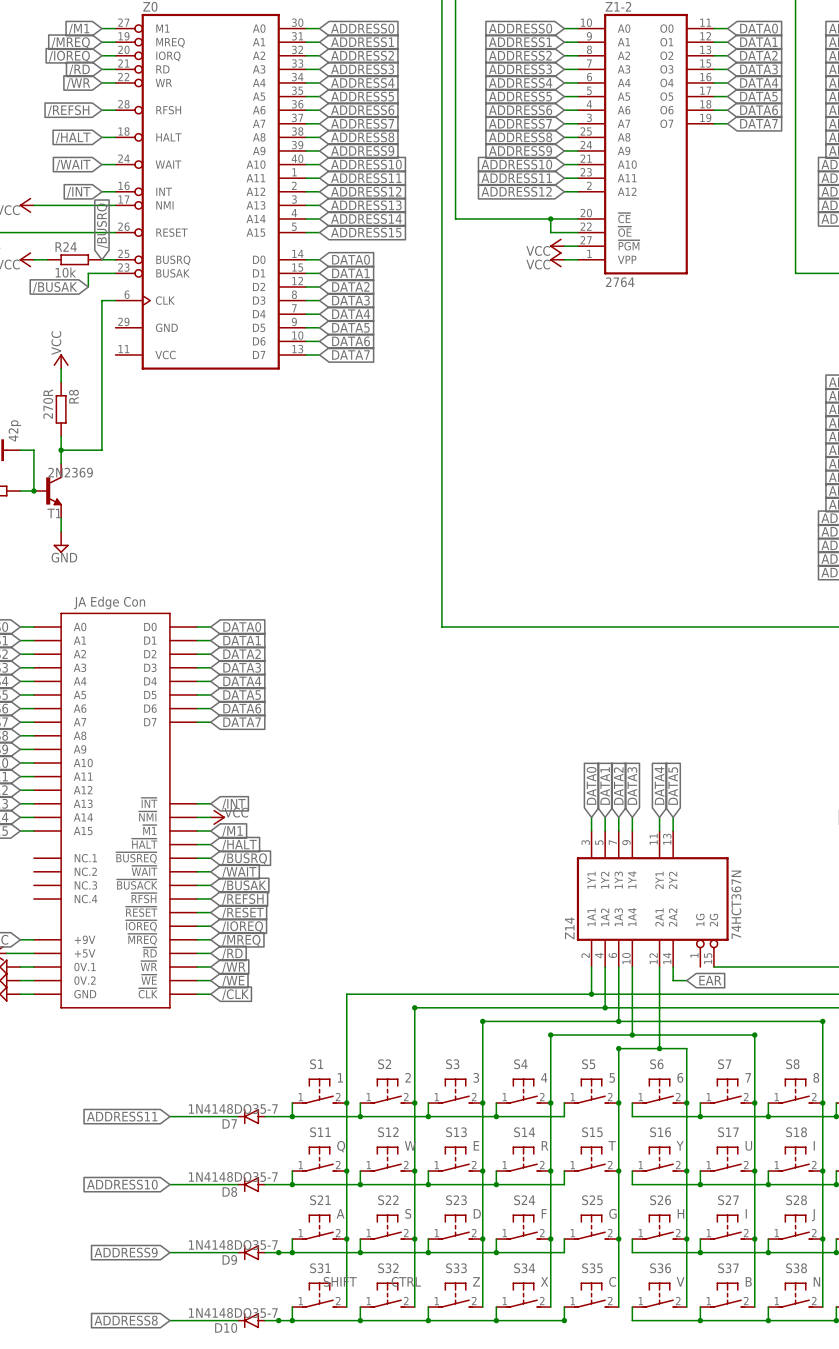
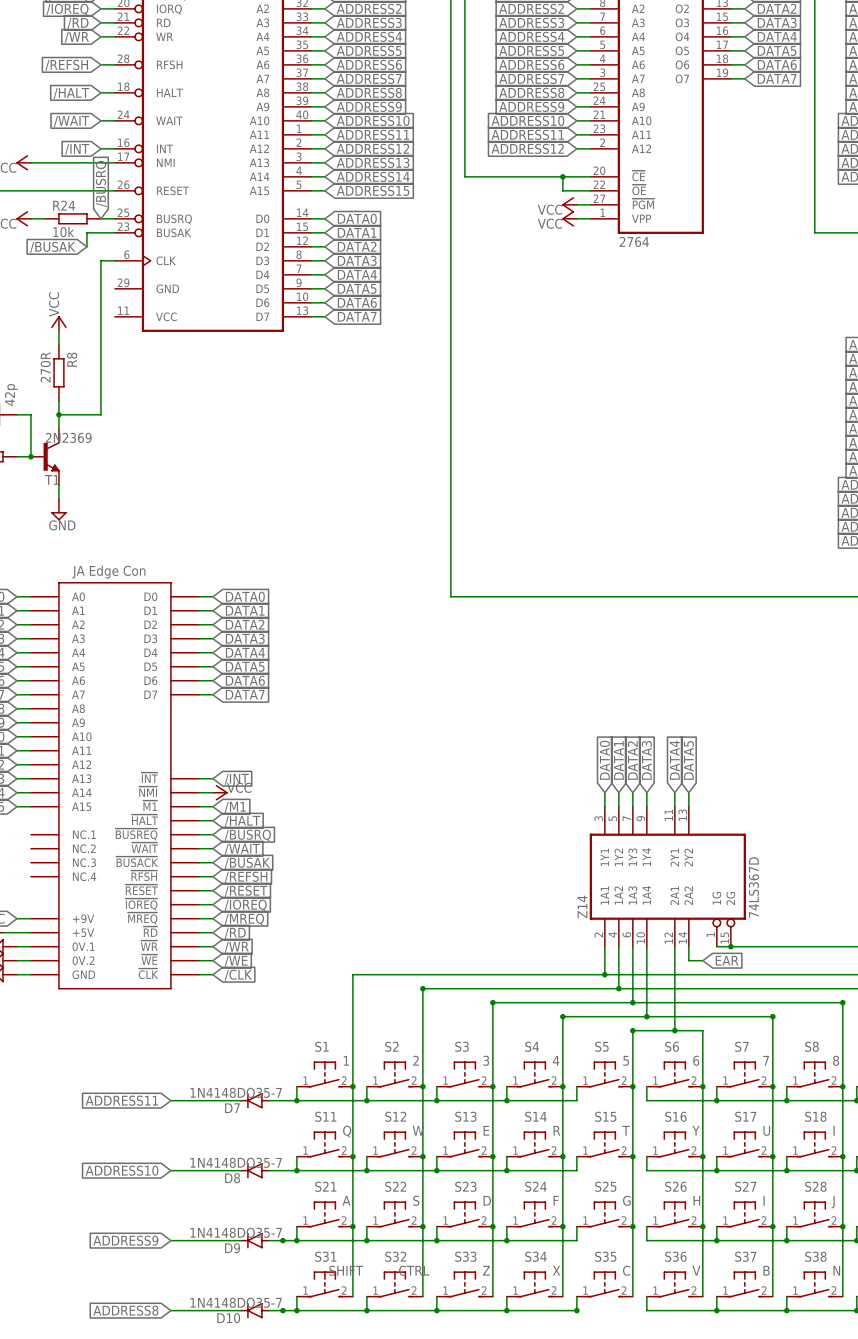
Z14 value: 74HCT367N (736, 904) -> 74LS367D (753, 887)
wire: none -> (716, 946) (730, 946)
junction: none -> (730, 946)

